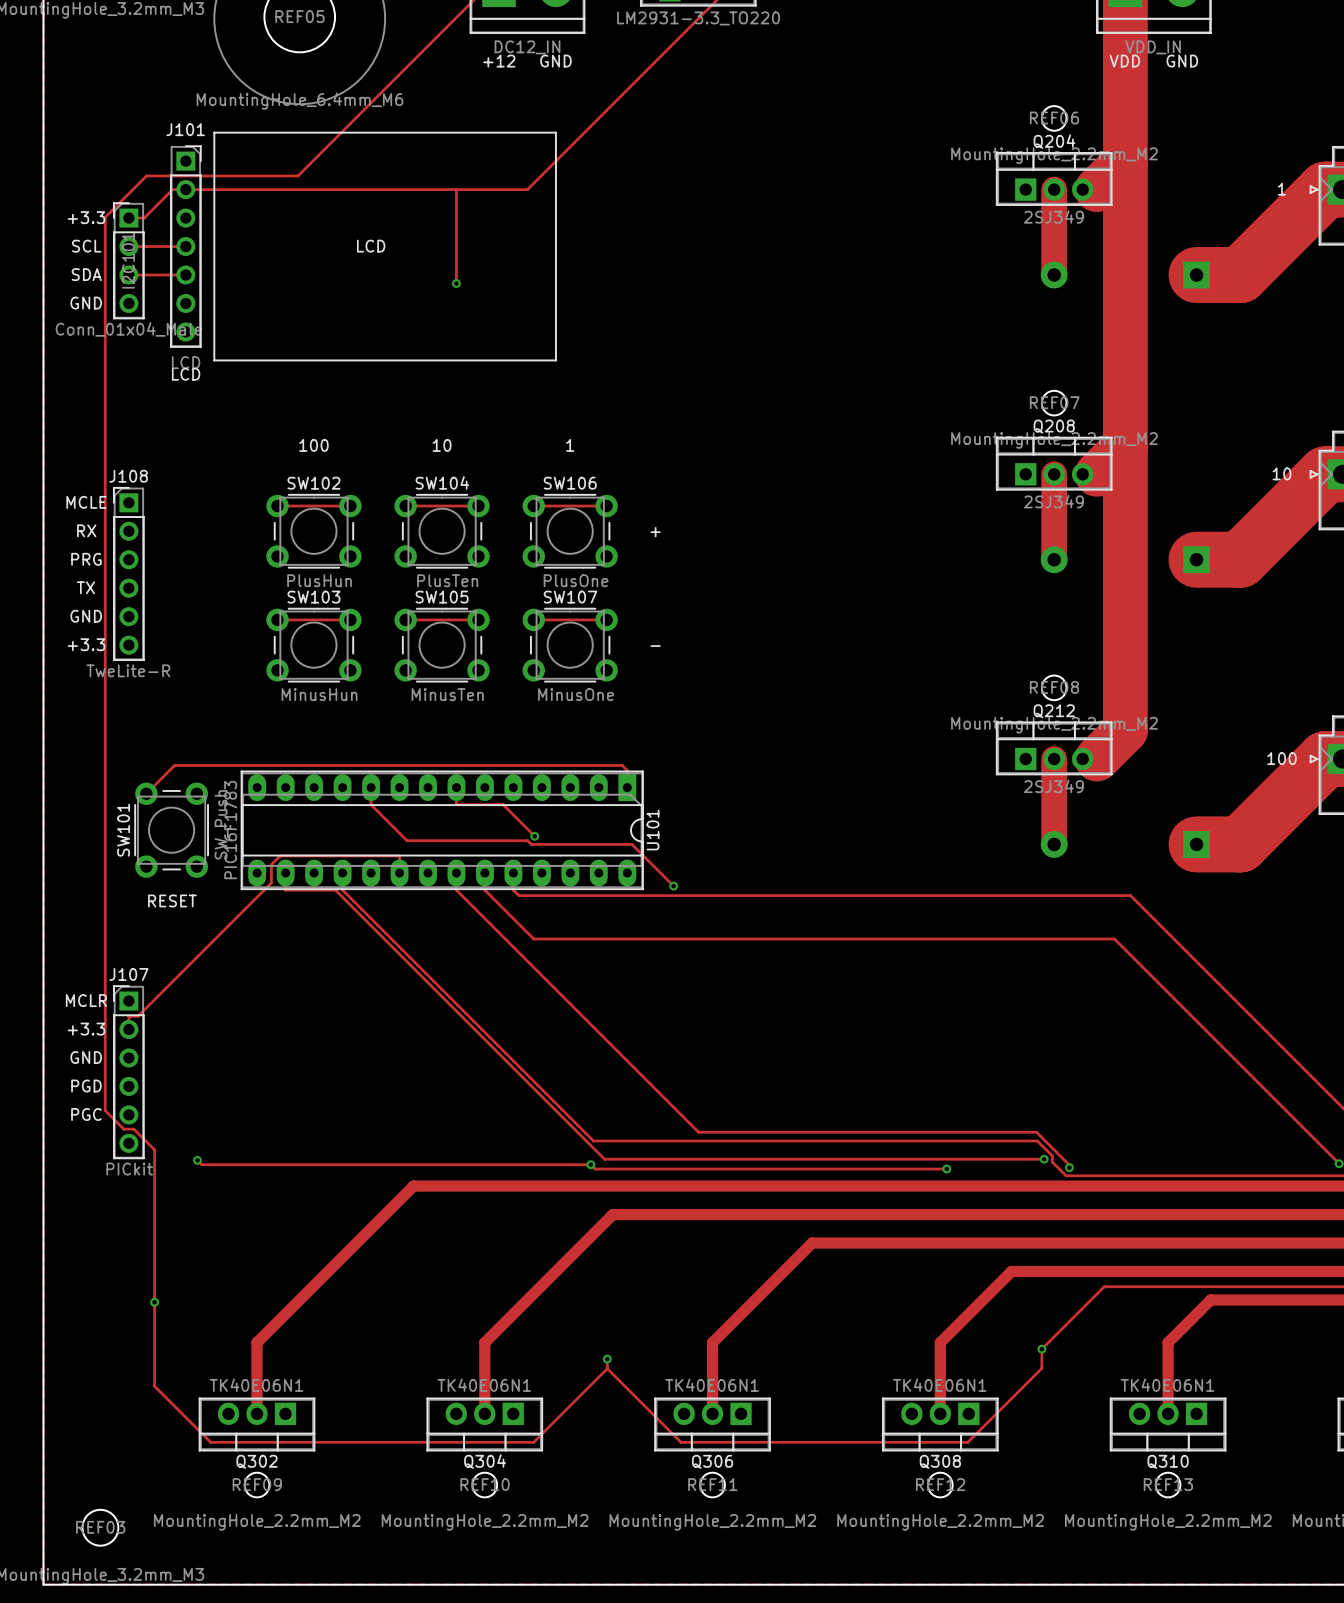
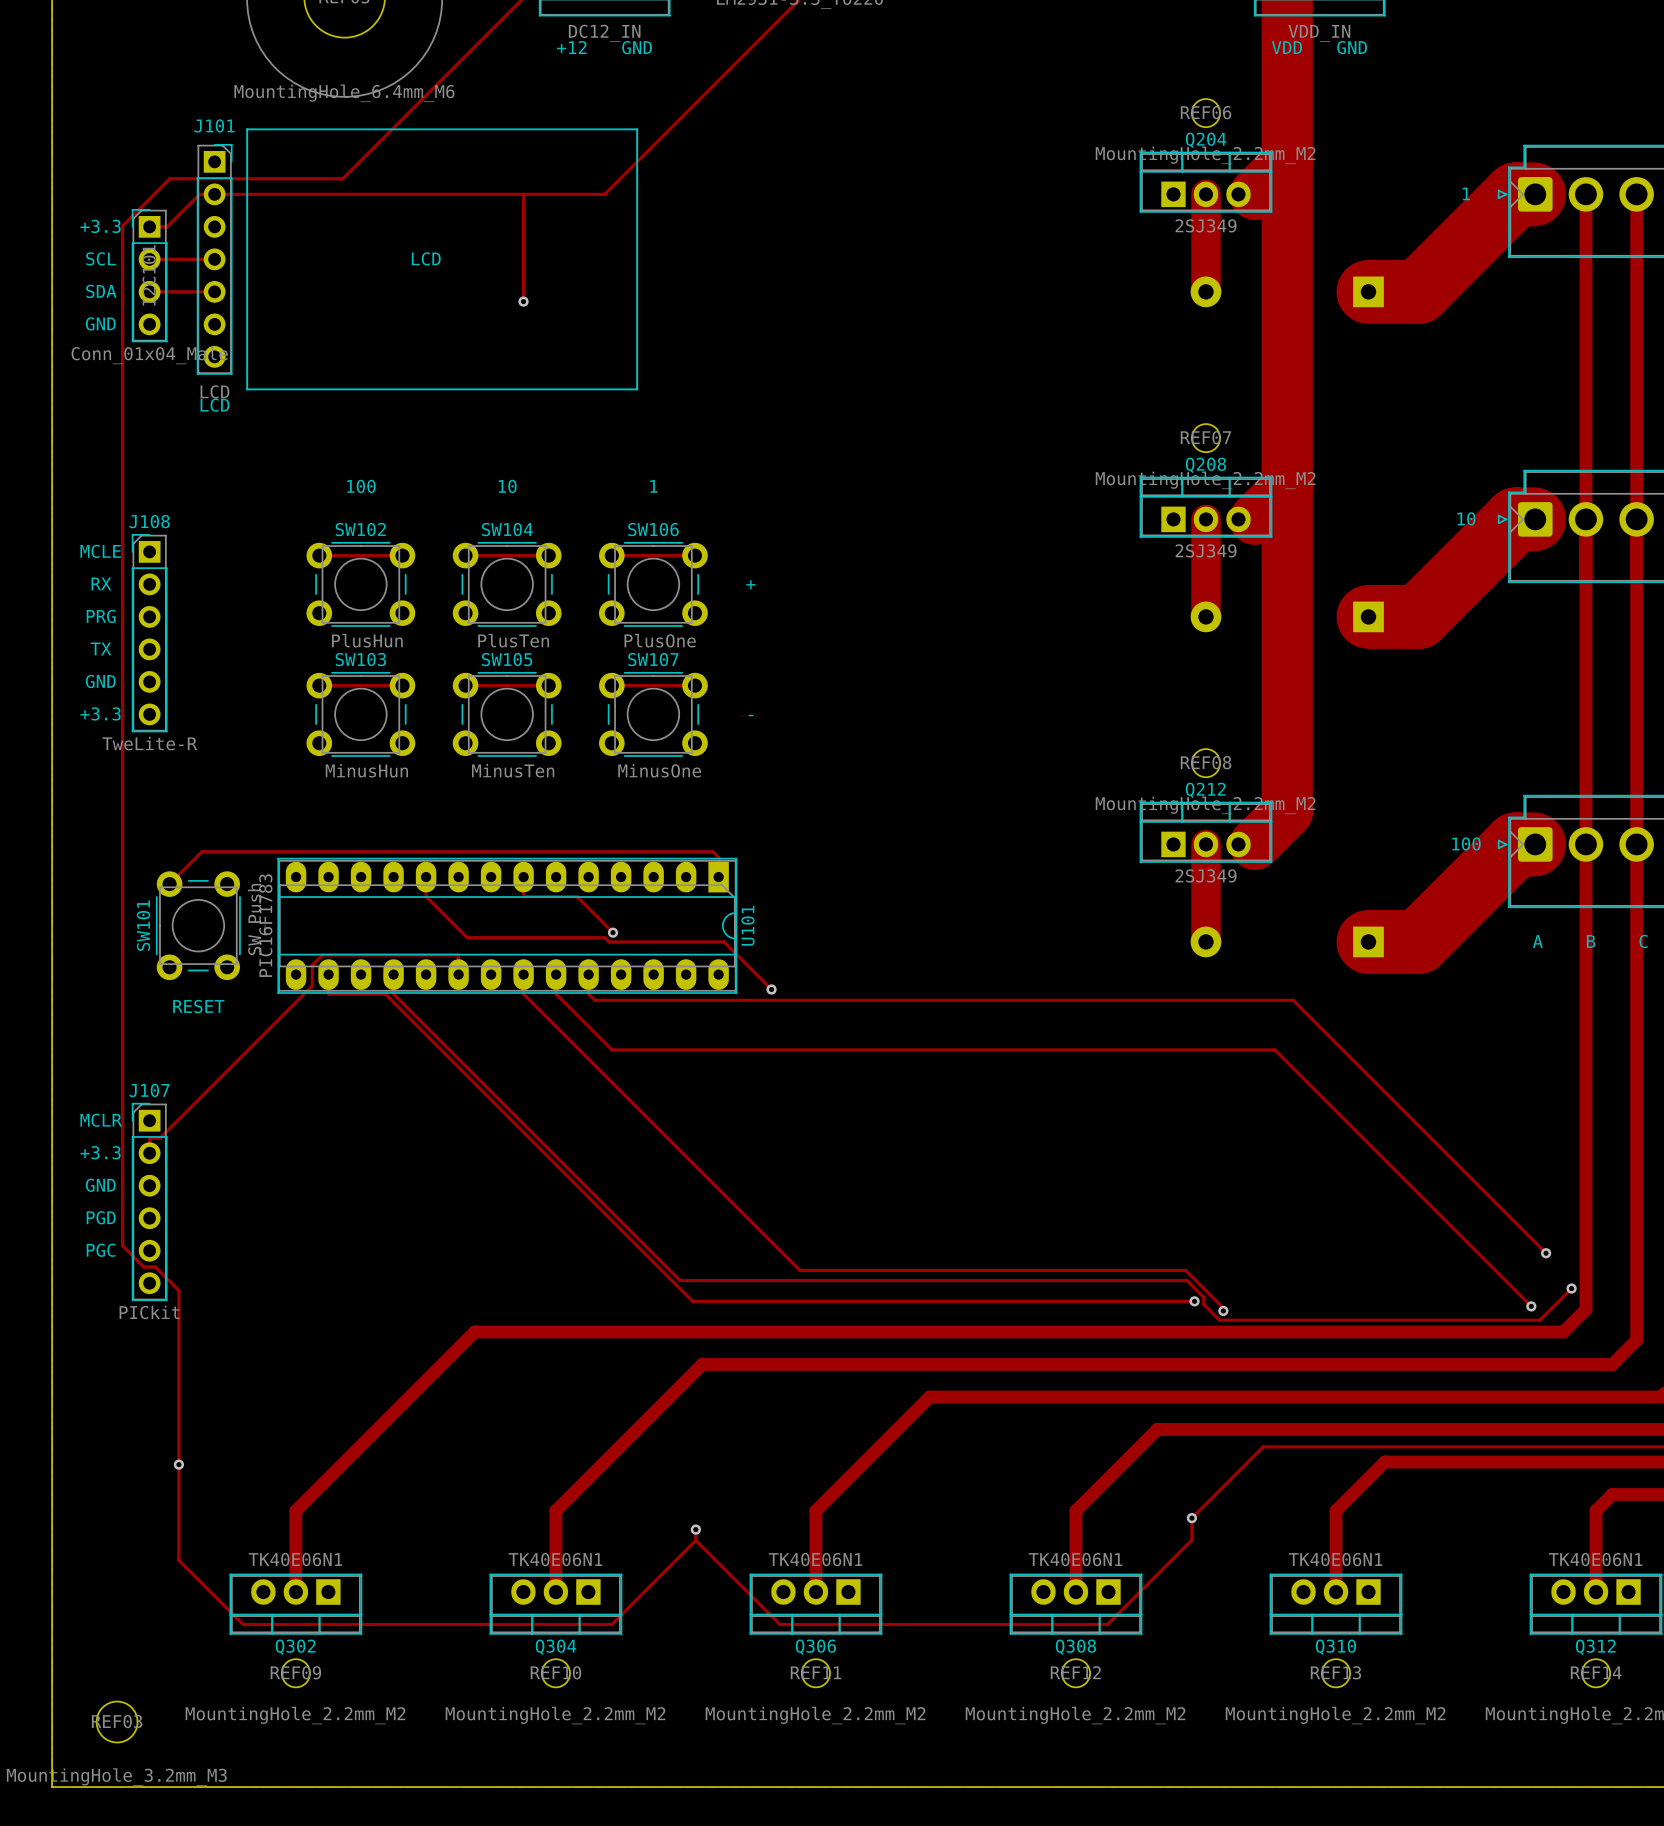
track: (197, 1160) (201, 1164) (590, 1164) (595, 1169) (946, 1169) -> none
via: (197, 1160) -> none
via: (590, 1164) -> none
via: (946, 1169) -> none

